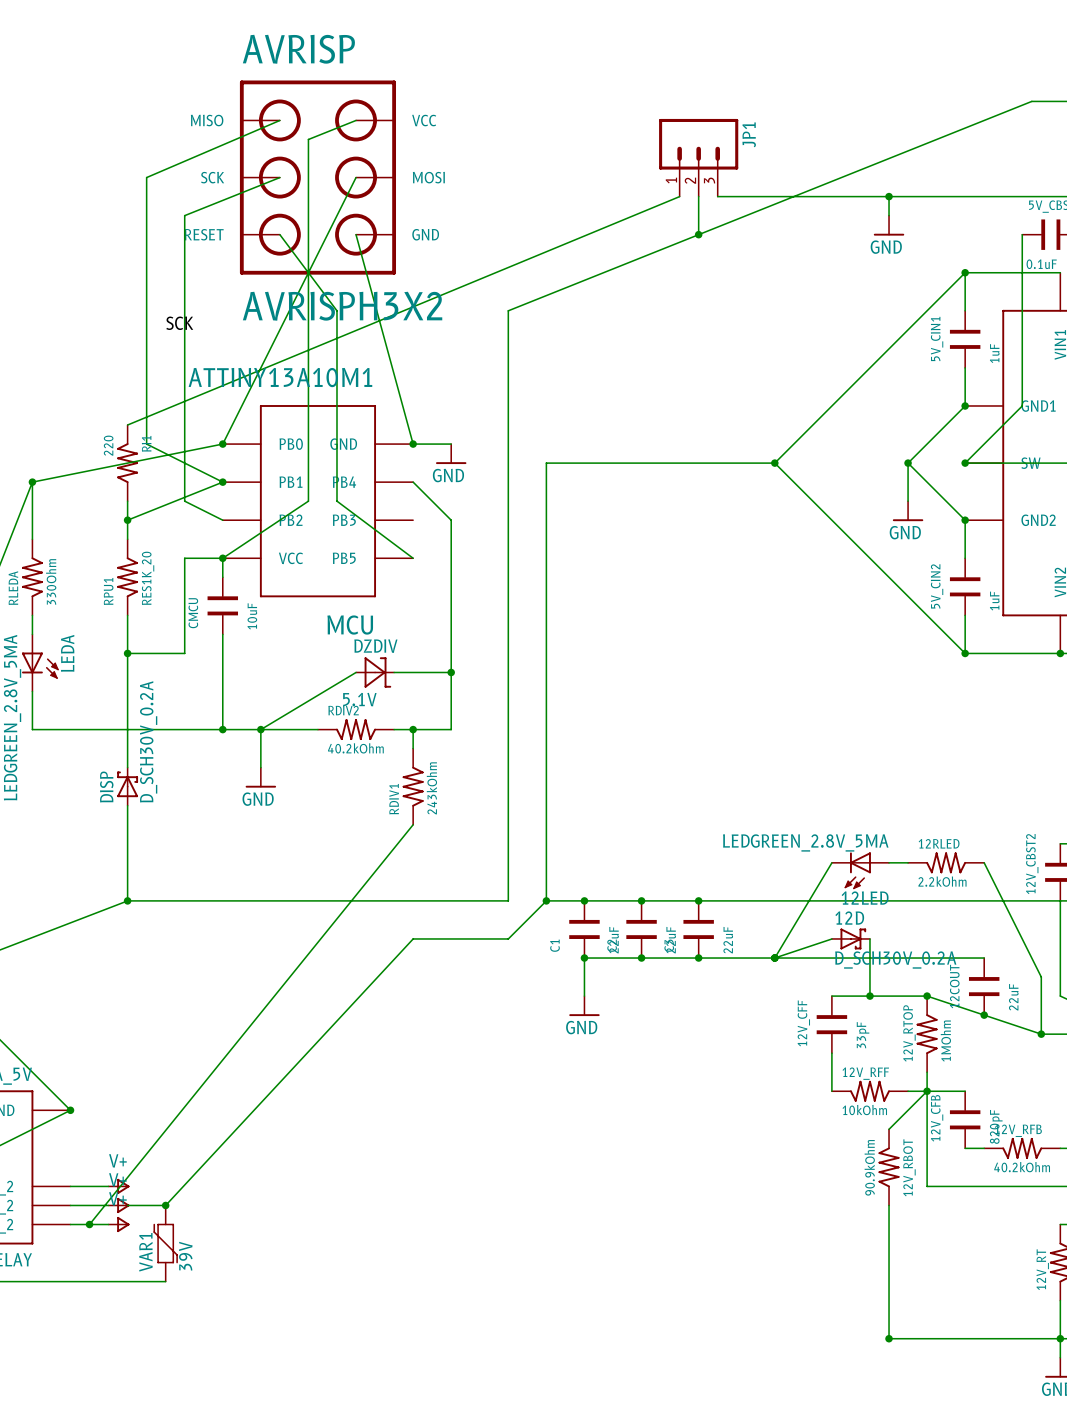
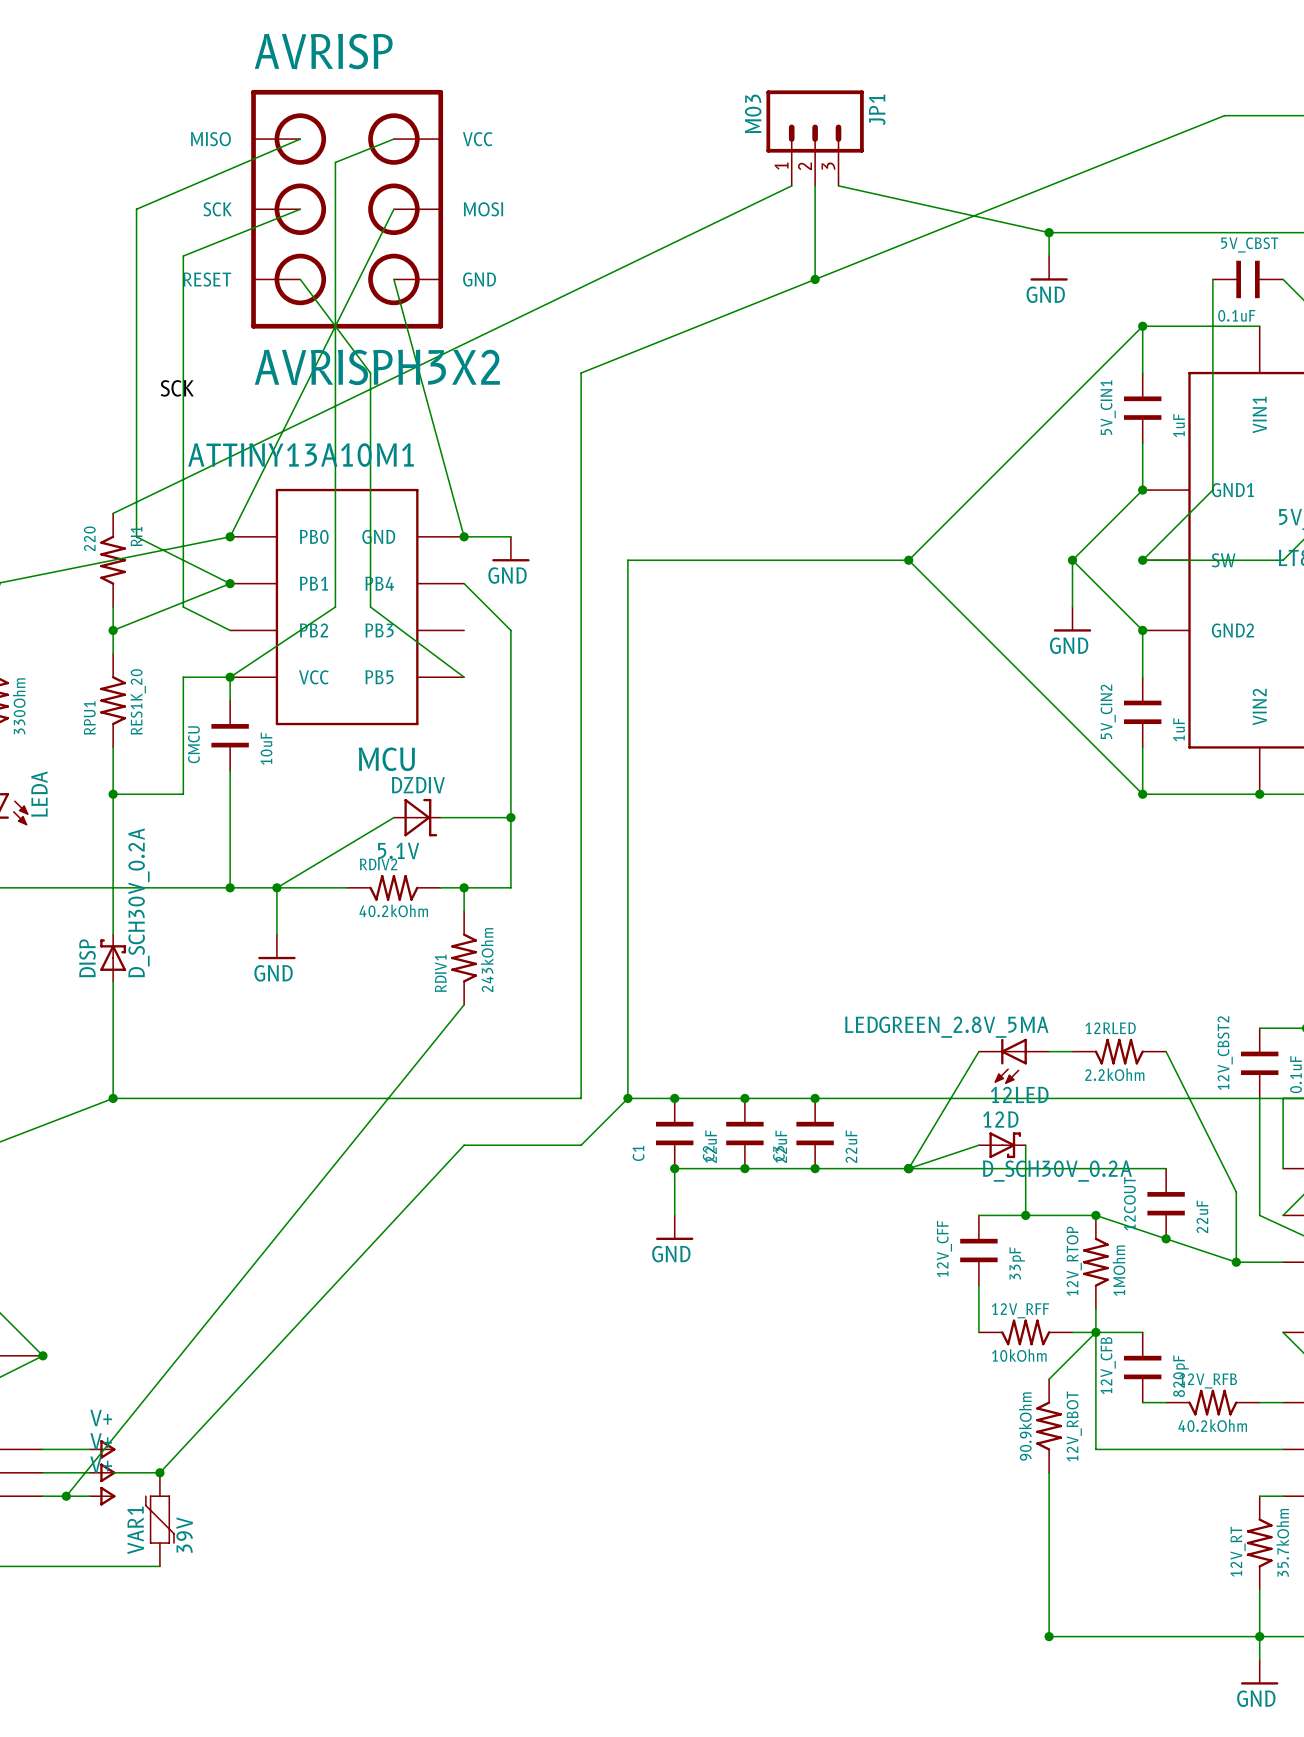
JP1 value: none -> M03 (753, 113)
JP1 position: (698, 157) -> (815, 138)
wire: (679, 196) (127, 425) -> (791, 185) (113, 513)
wire: (717, 196) (889, 196) -> (838, 185) (1049, 232)

